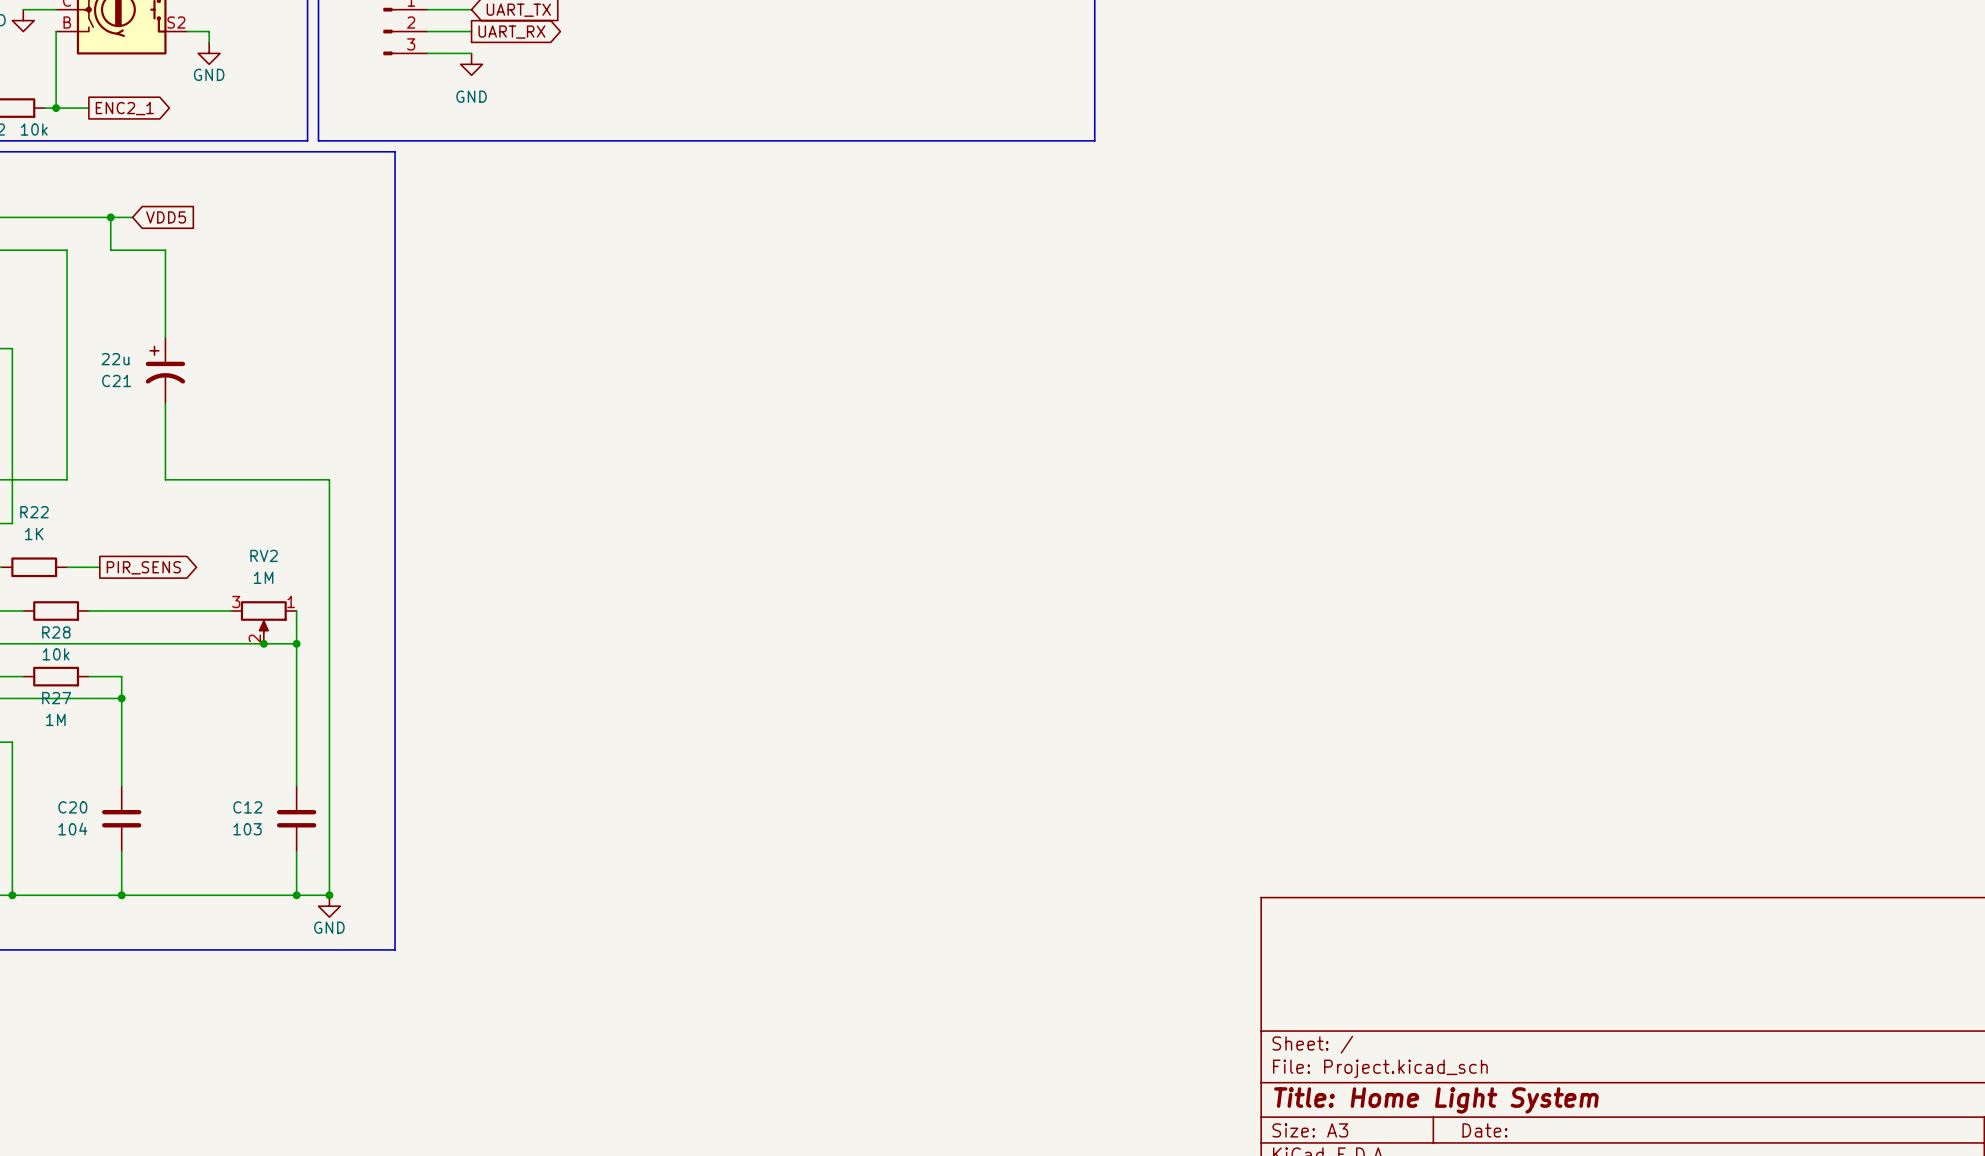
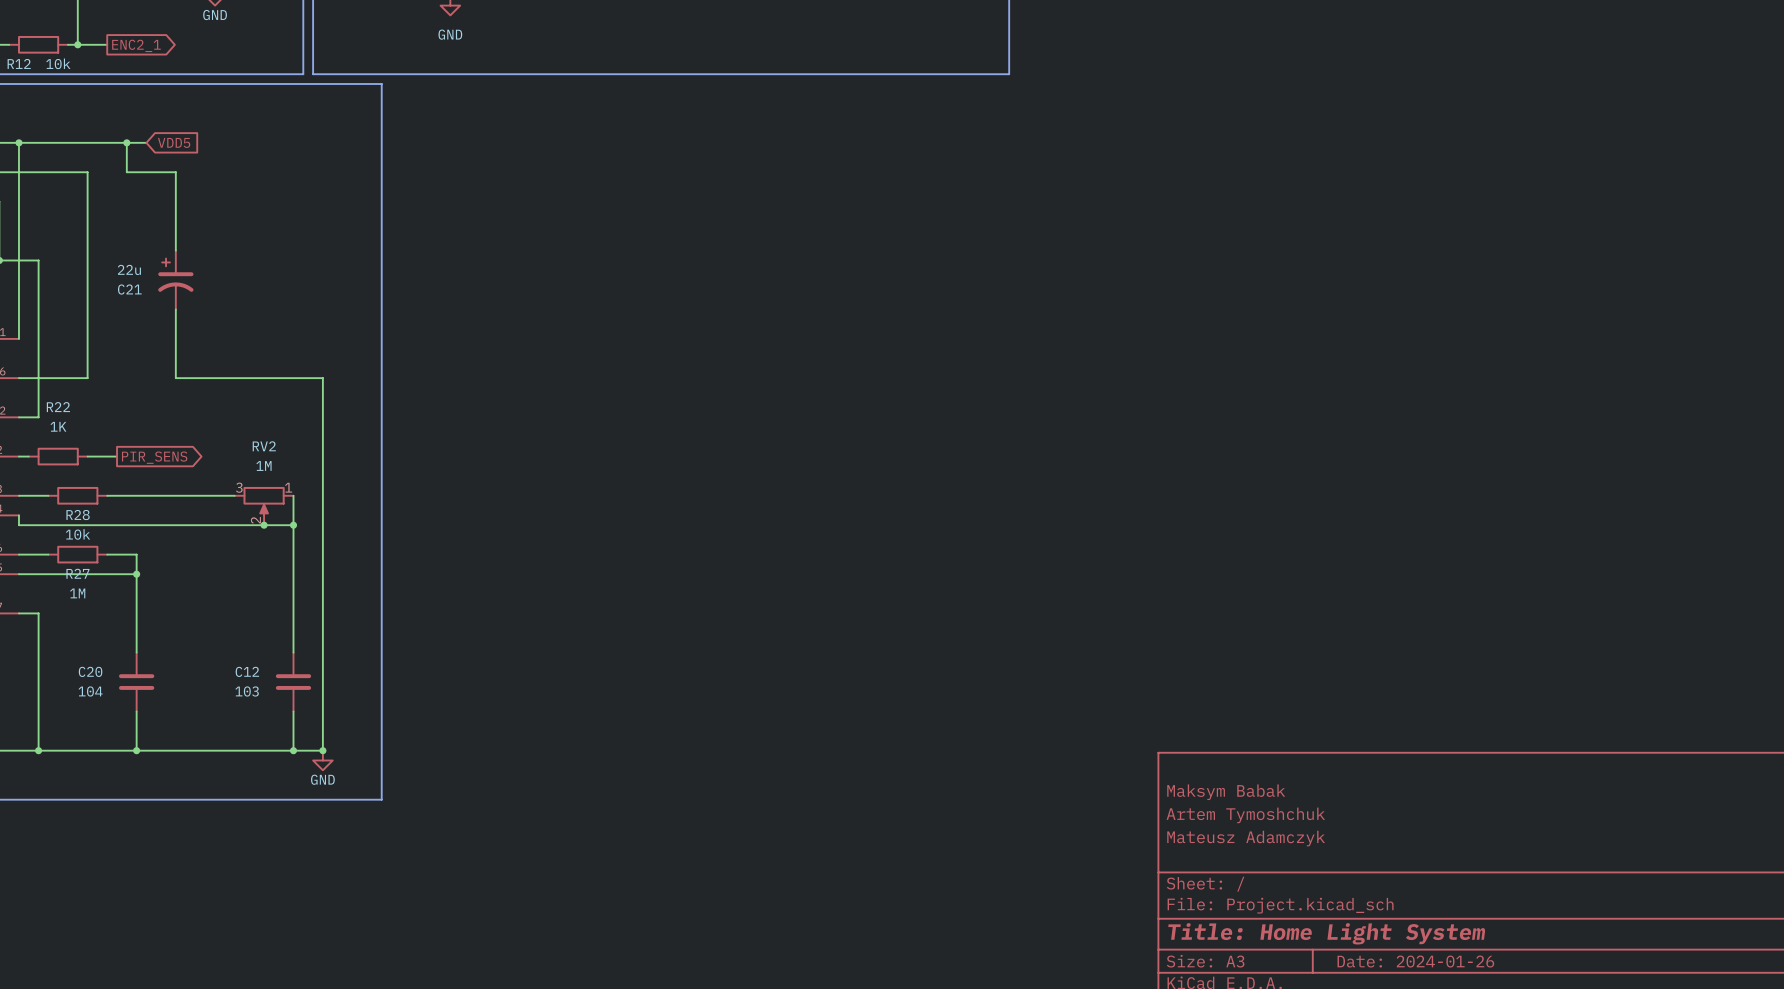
title block: none -> Maksym Babak (1226, 792)
title block: none -> Artem Tymoshchuk (1245, 815)
title block: none -> Mateusz Adamczyk (1246, 838)
title block: Date: (1484, 1130) -> Date: 2024-01-26 (1415, 961)

